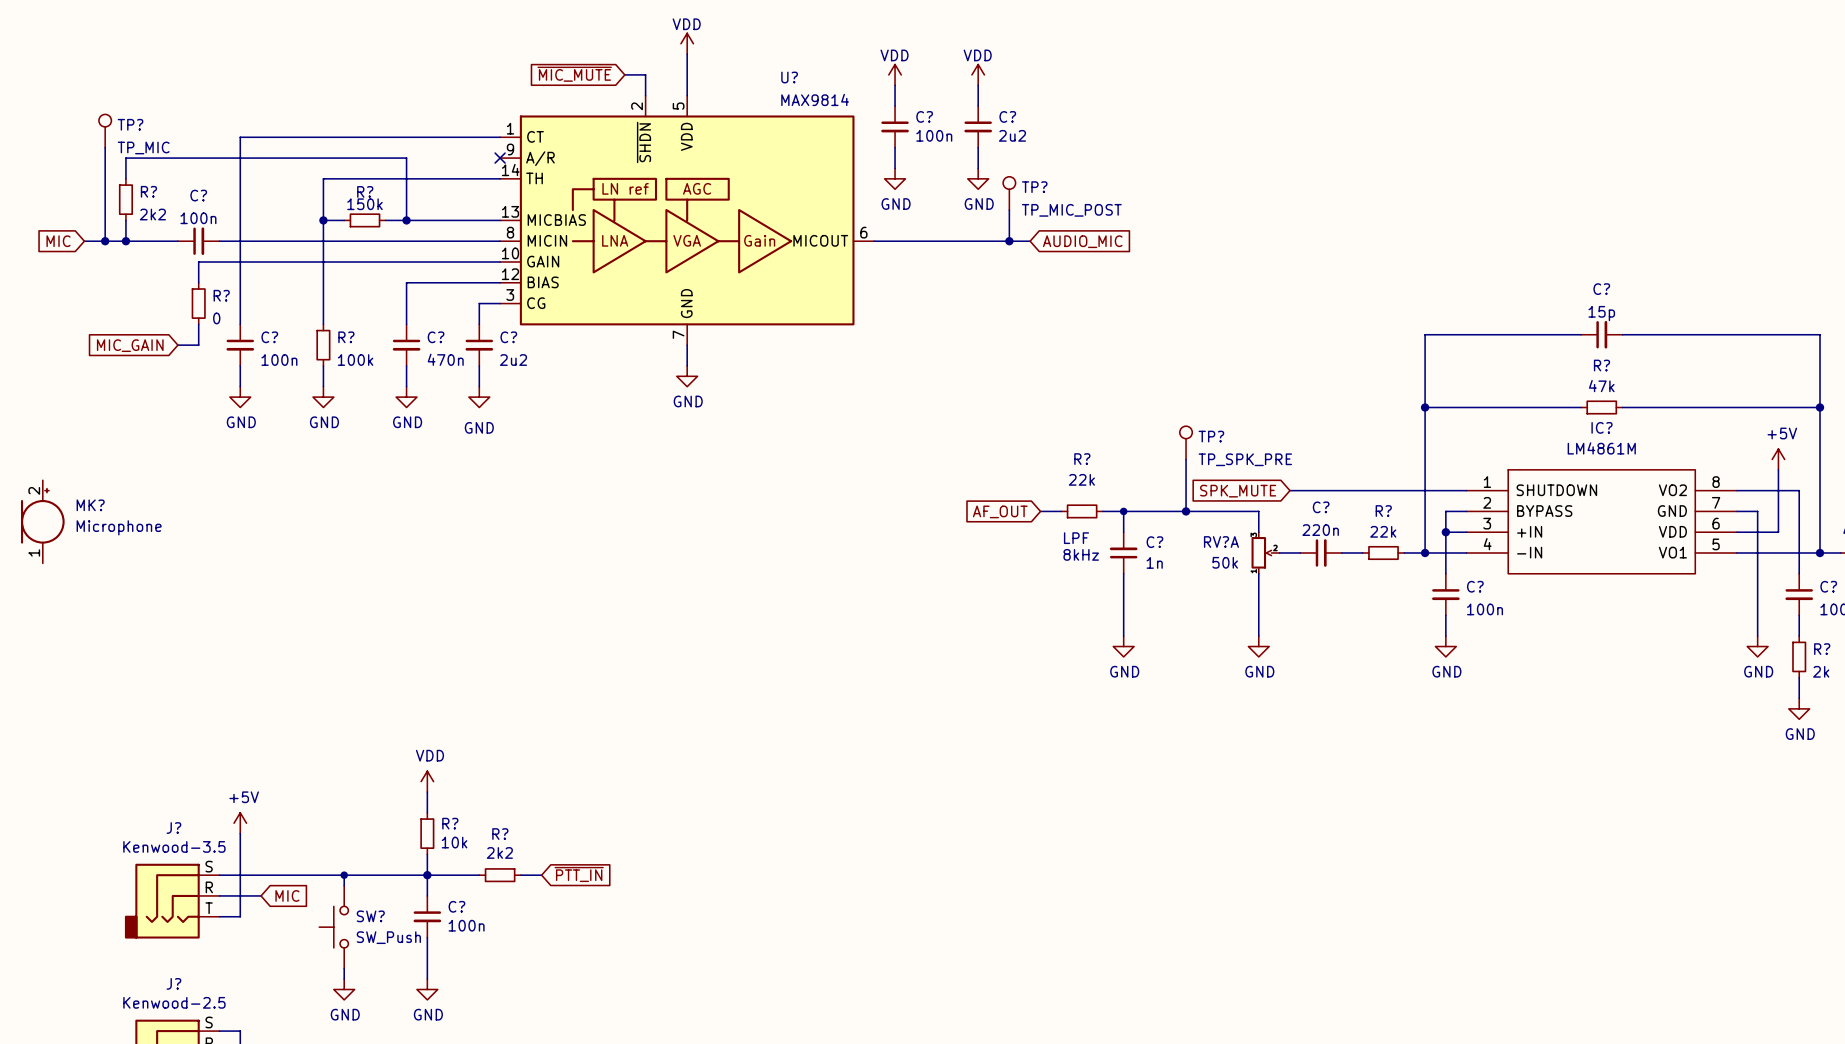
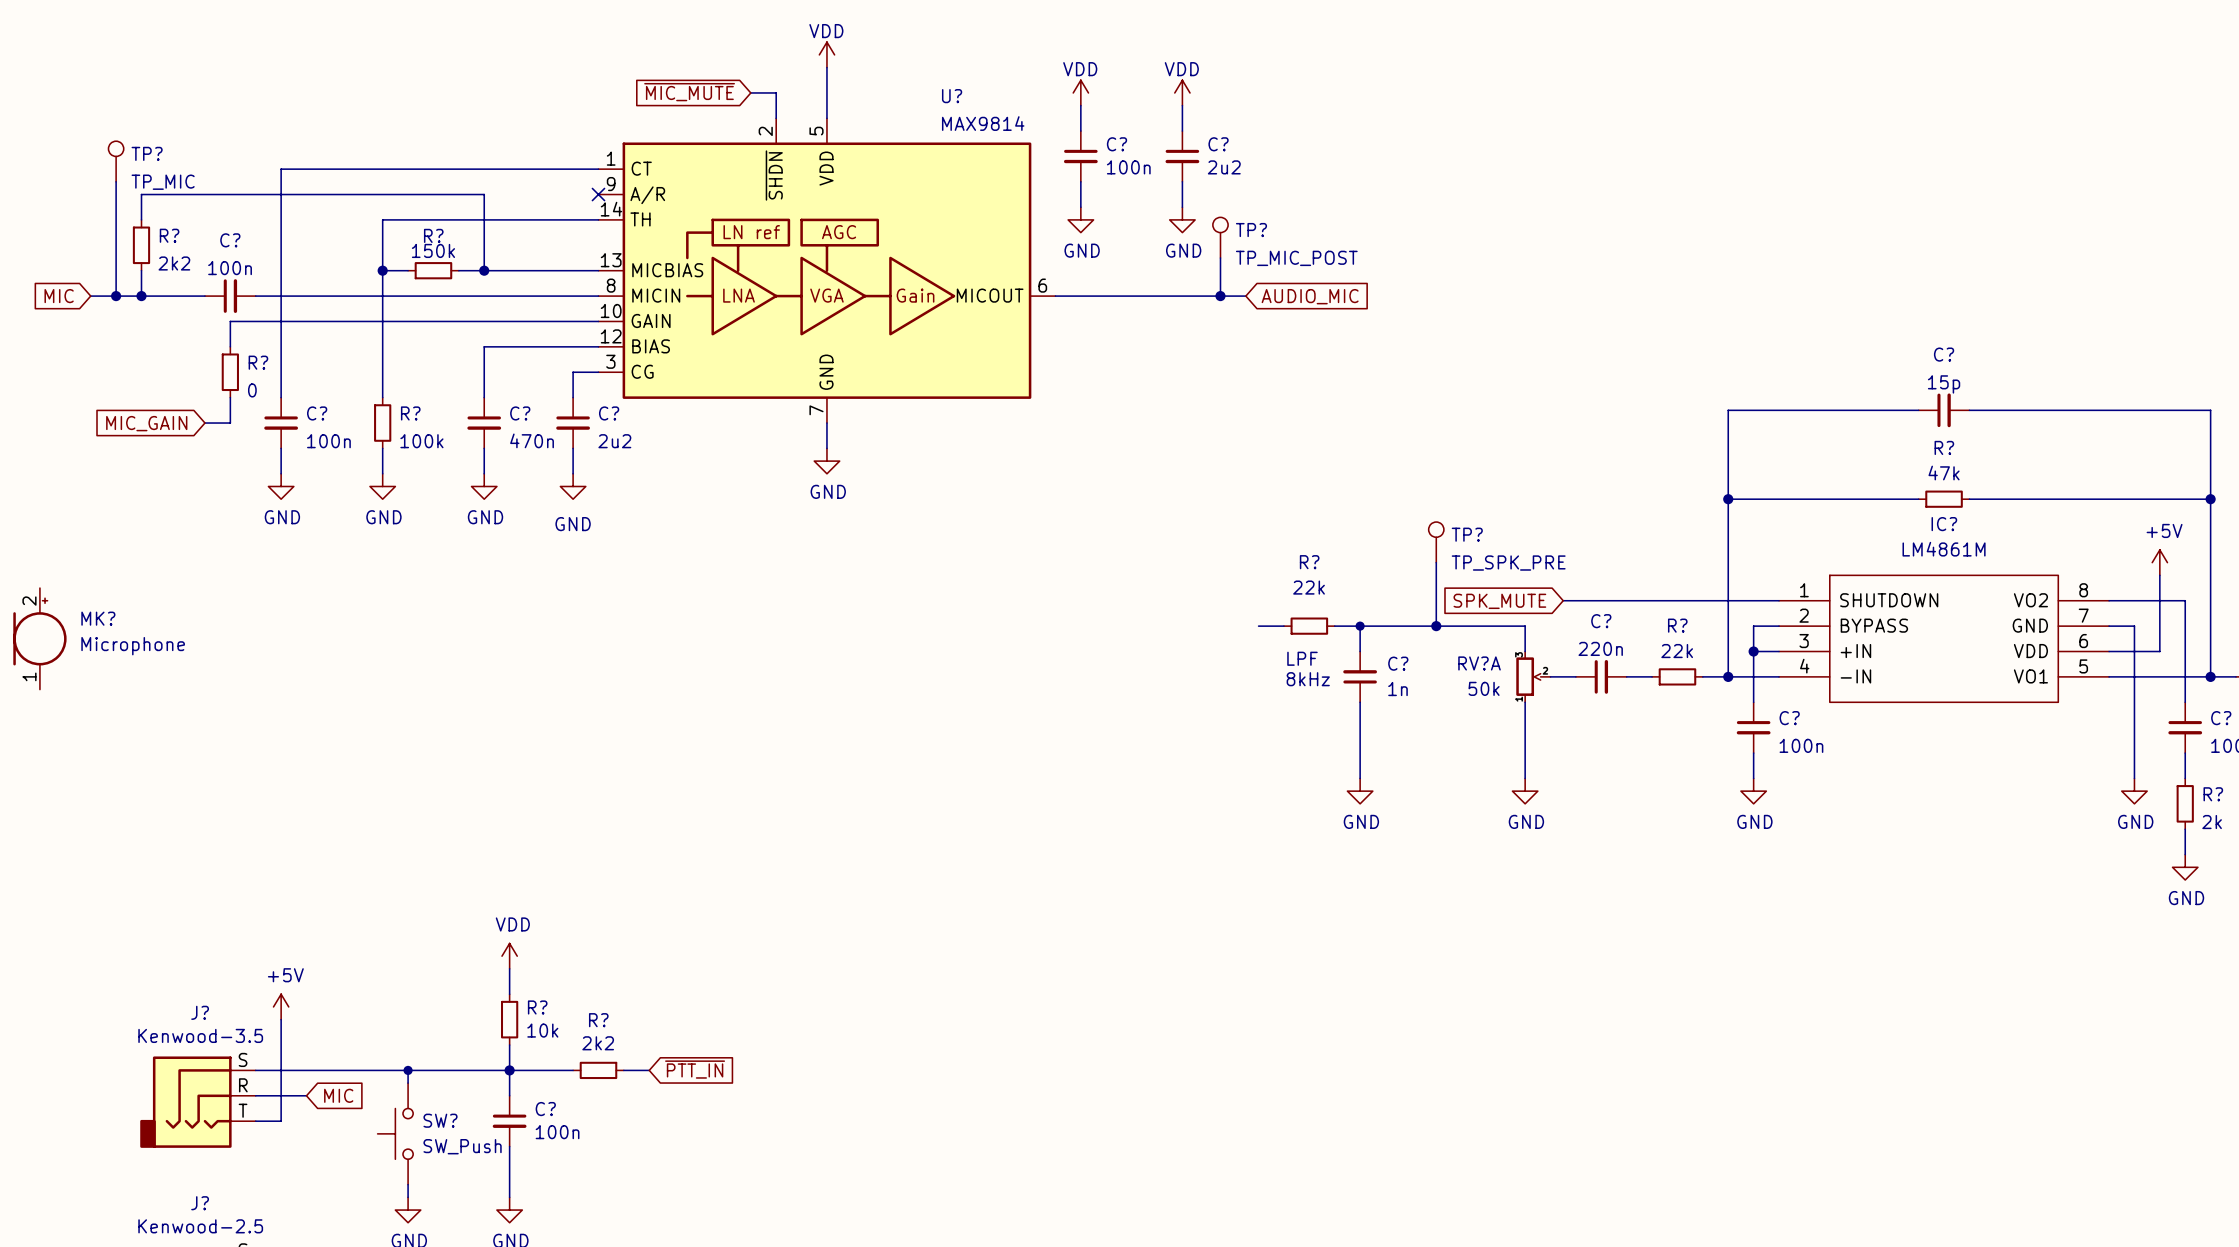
global label: AF_OUT (1000, 511) -> none

